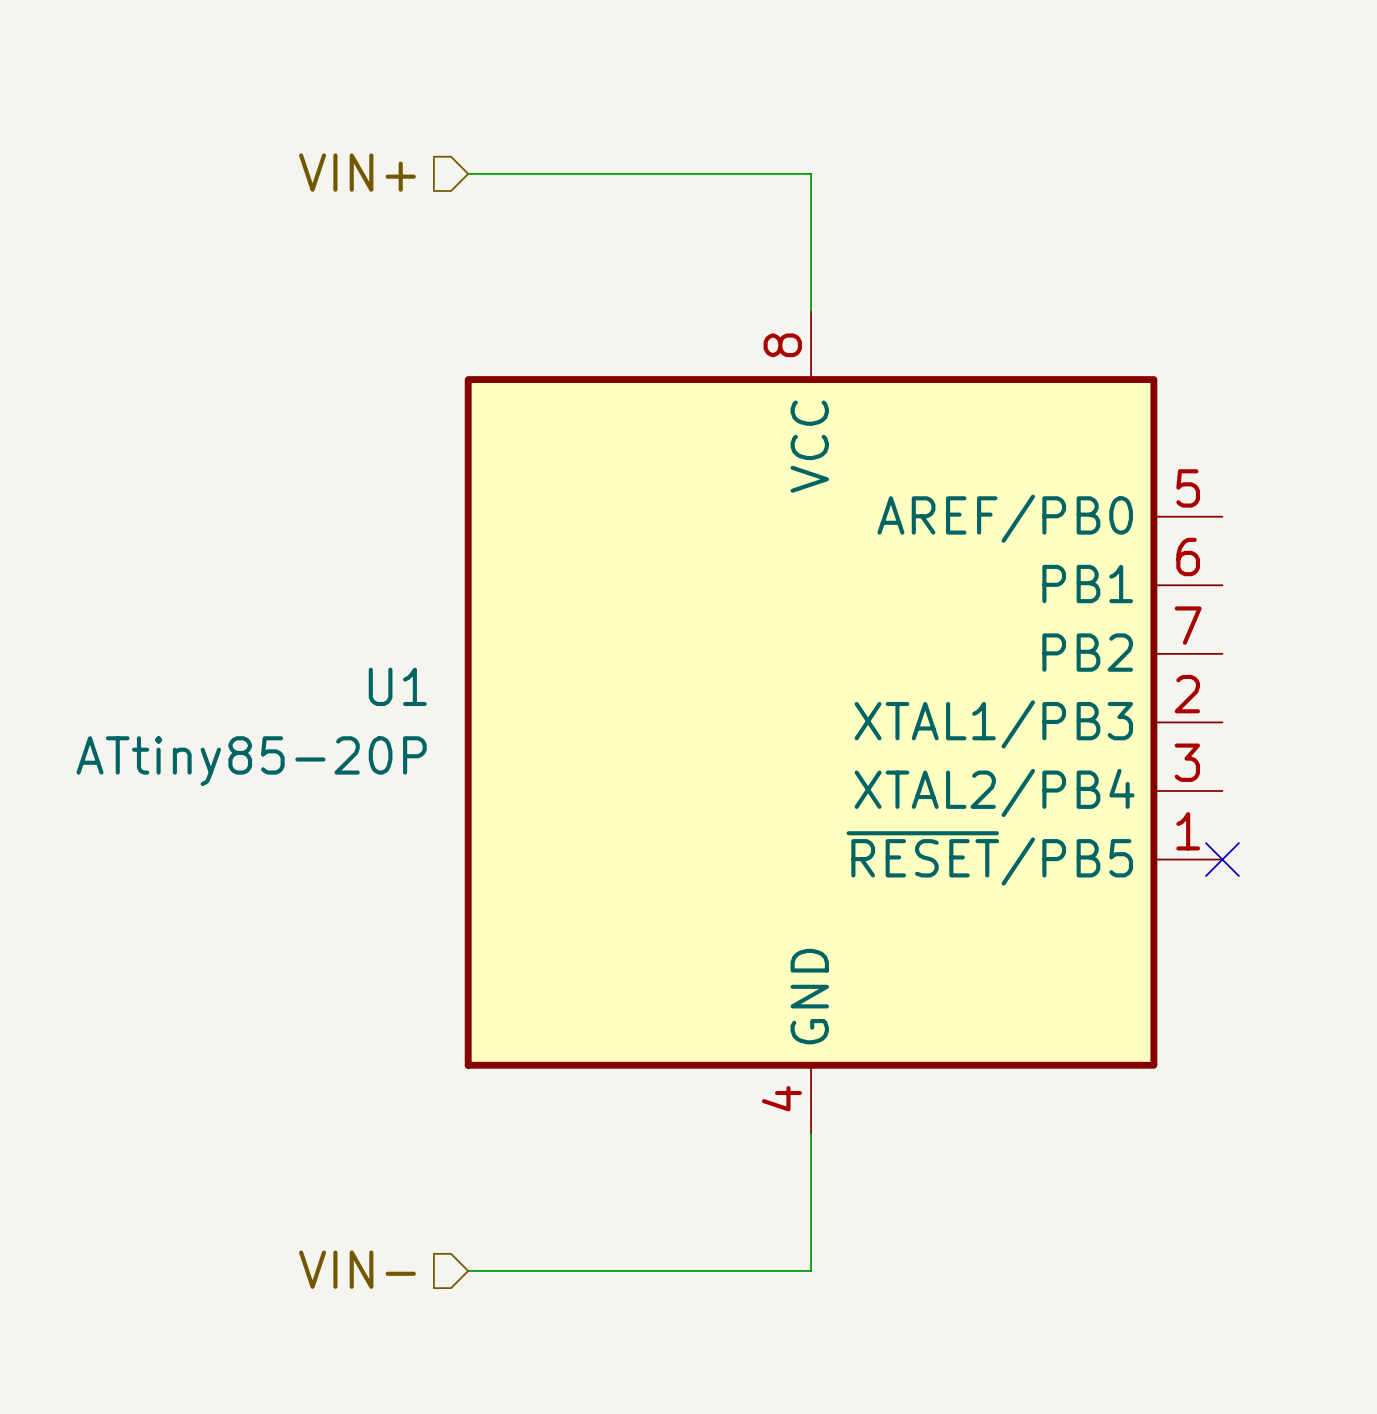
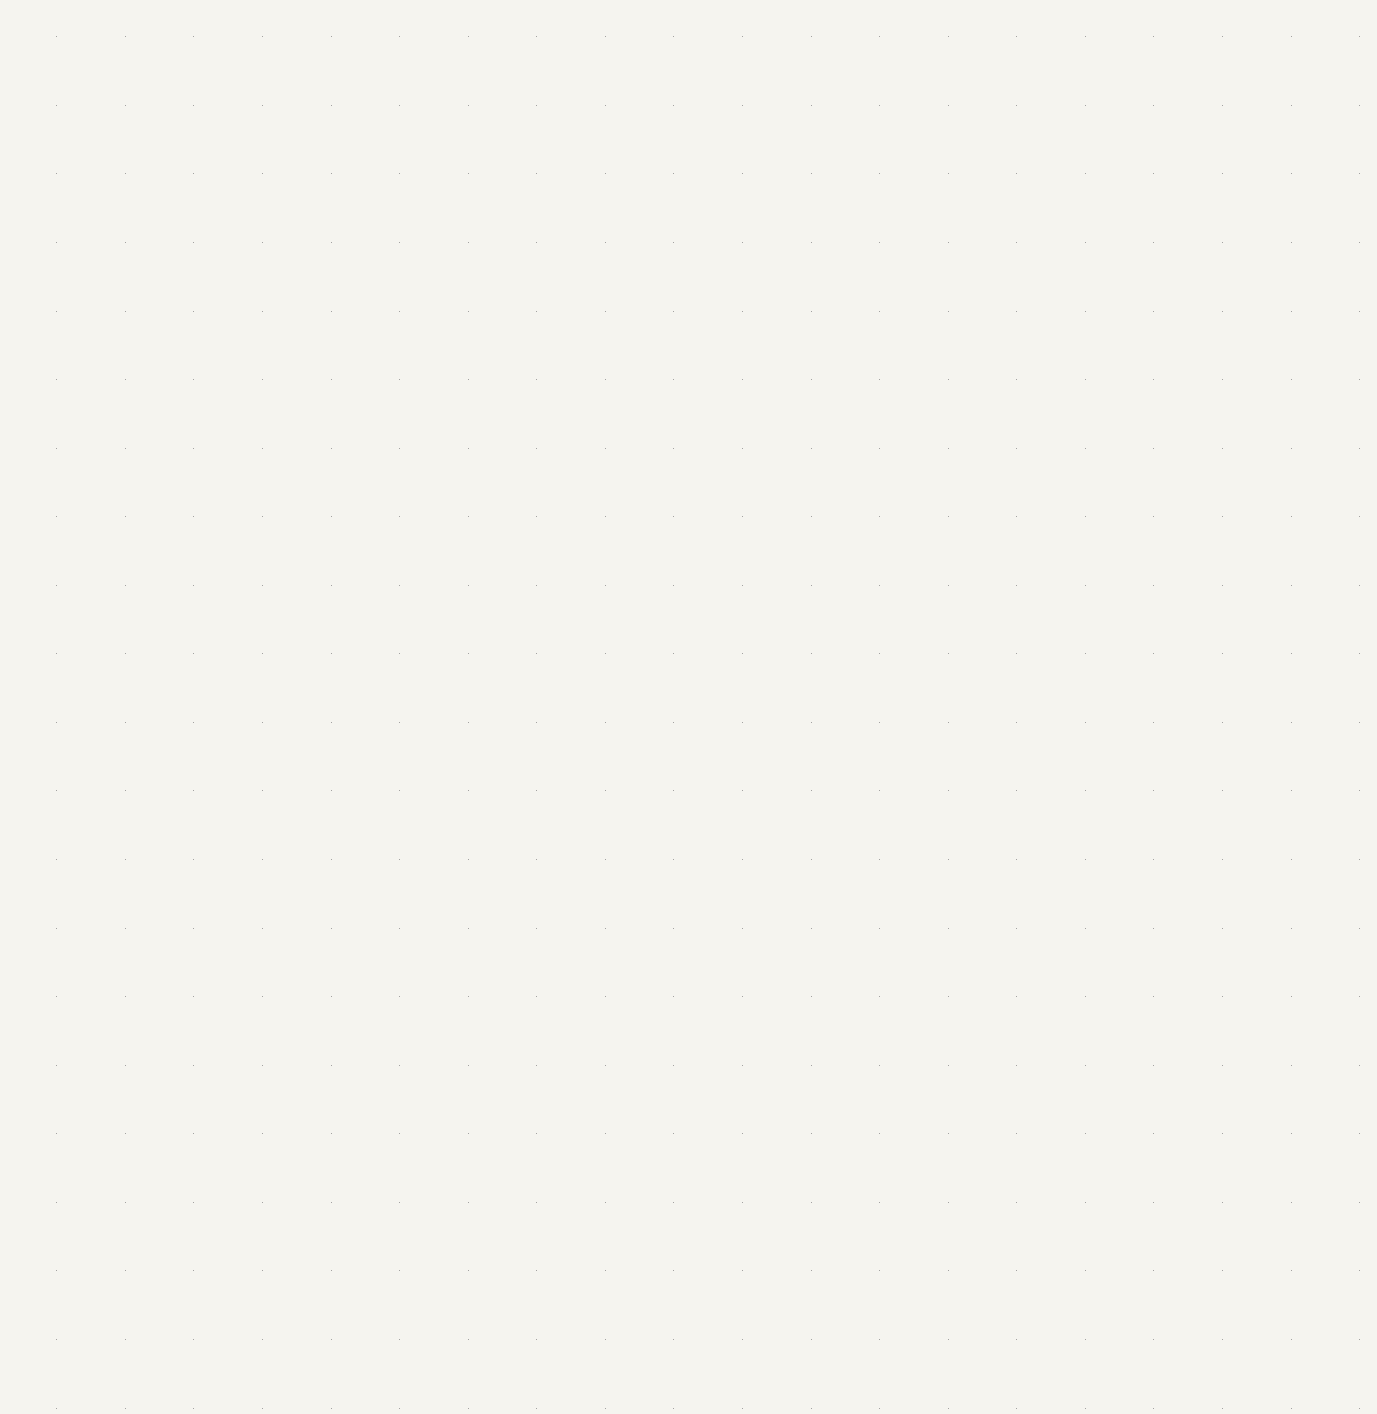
hierarchical label: VIN+ (357, 172) -> none
wire: (468, 173) (811, 173) (811, 311) -> none
U1: ATtiny85-20P (843, 722) -> none
no-connect mark: (1222, 859) -> none
wire: (811, 1133) (811, 1270) (468, 1270) -> none
hierarchical label: VIN- (357, 1269) -> none

